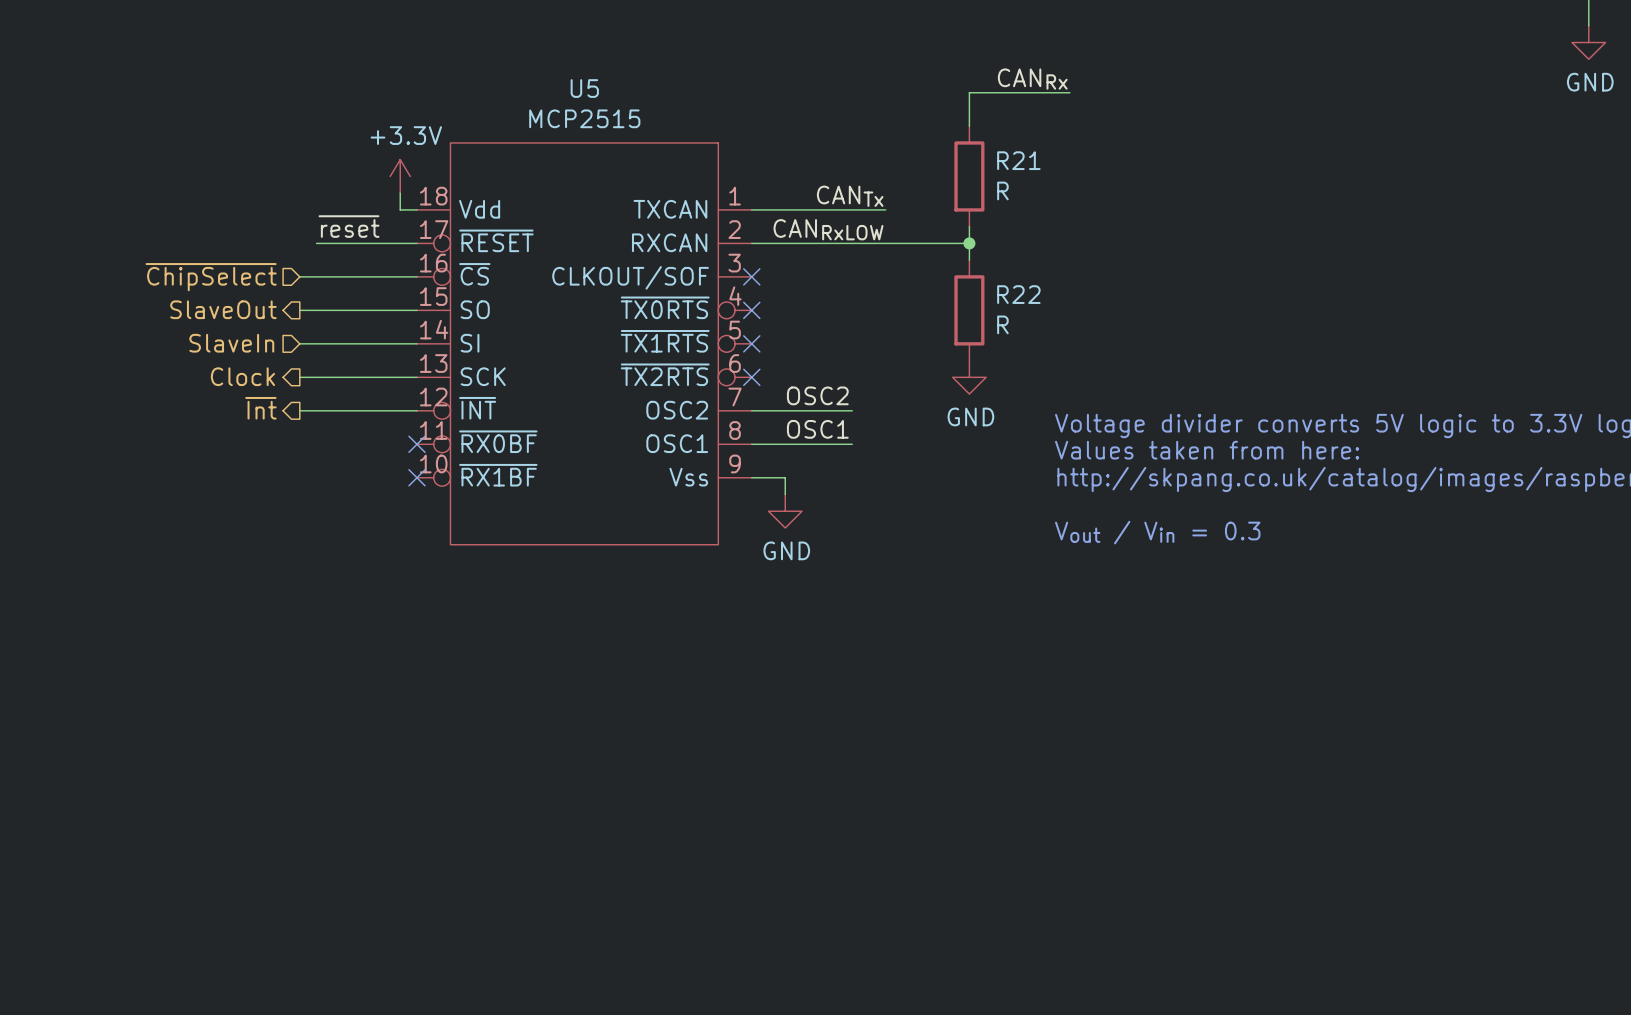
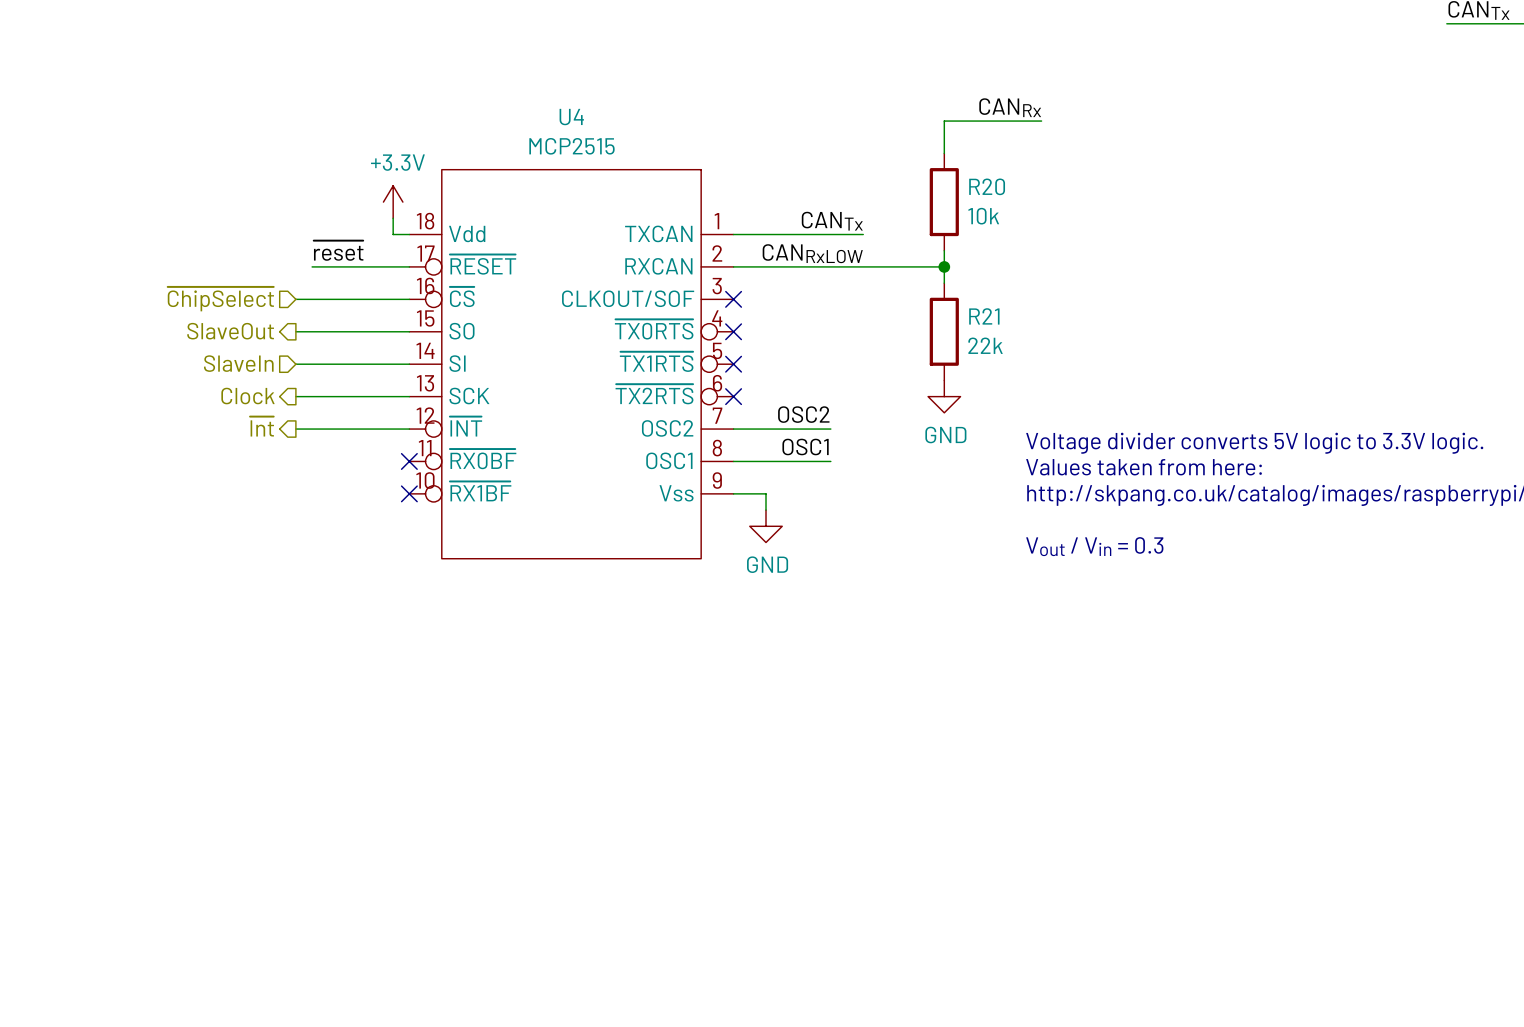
U5 name: U5 (584, 88) -> U4 (571, 117)
R21 name: R21 (1018, 160) -> R20 (987, 186)
R21 value: R (1002, 190) -> 10k (983, 216)
R22 name: R22 (1018, 294) -> R21 (984, 316)
R22 value: R (1002, 324) -> 22k (985, 345)

